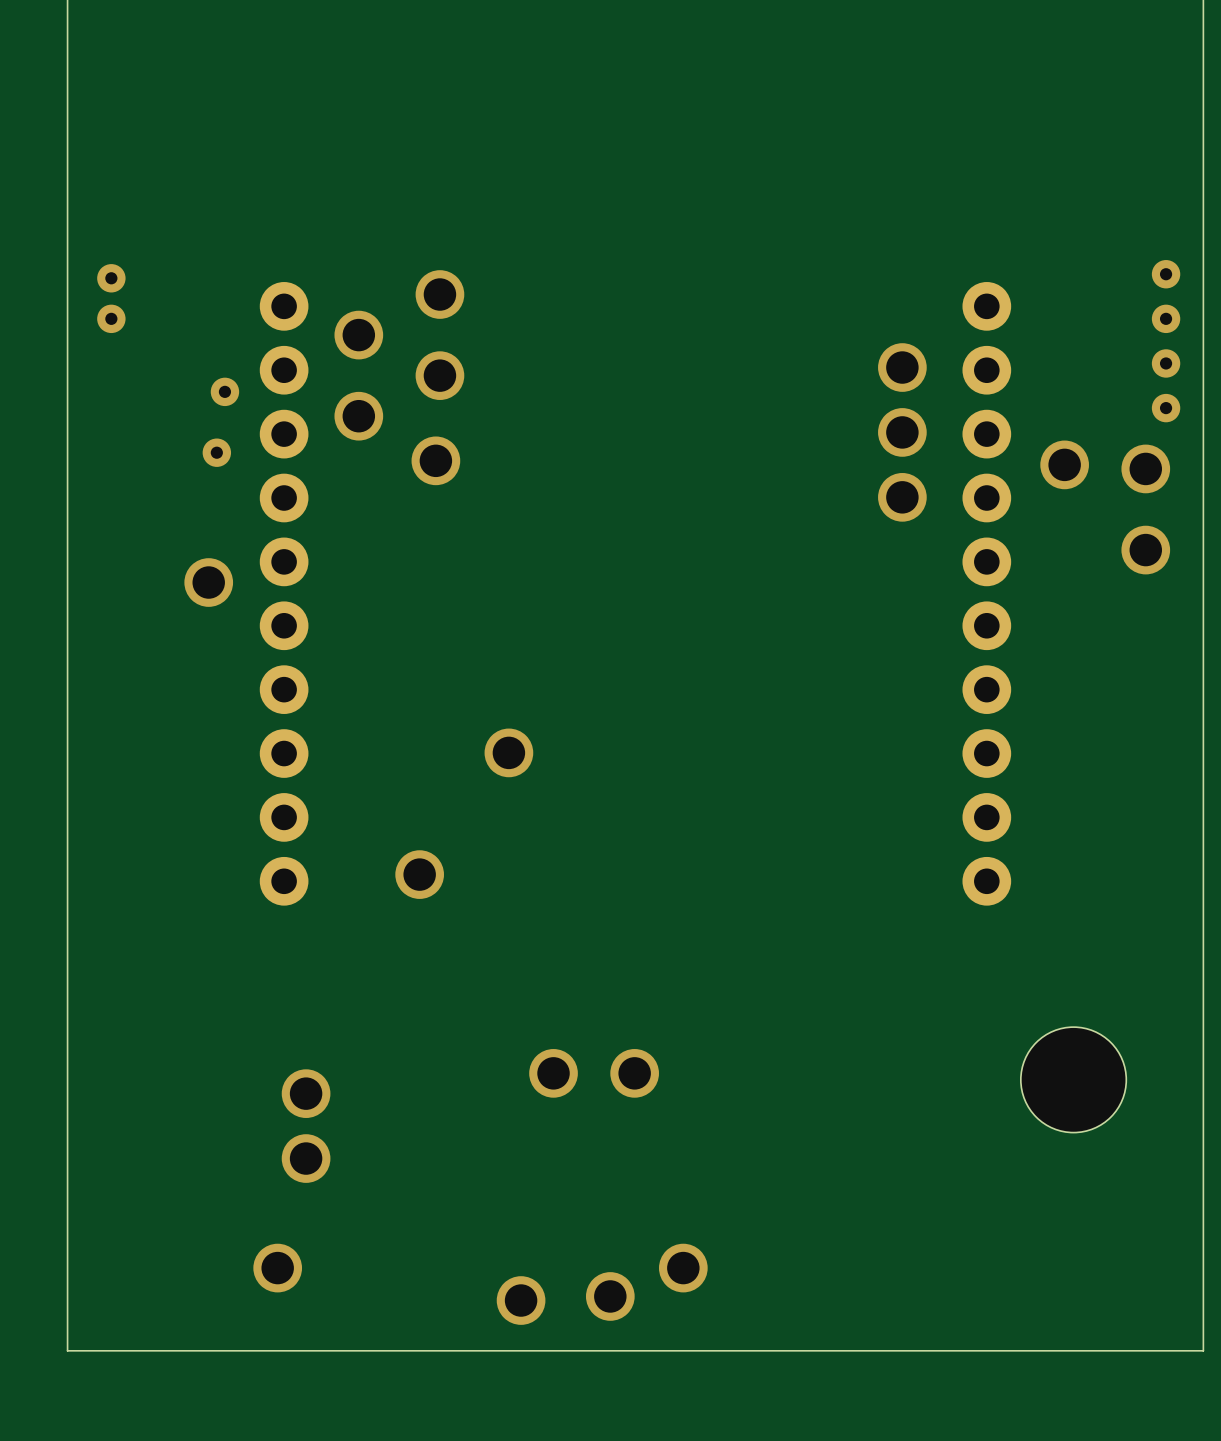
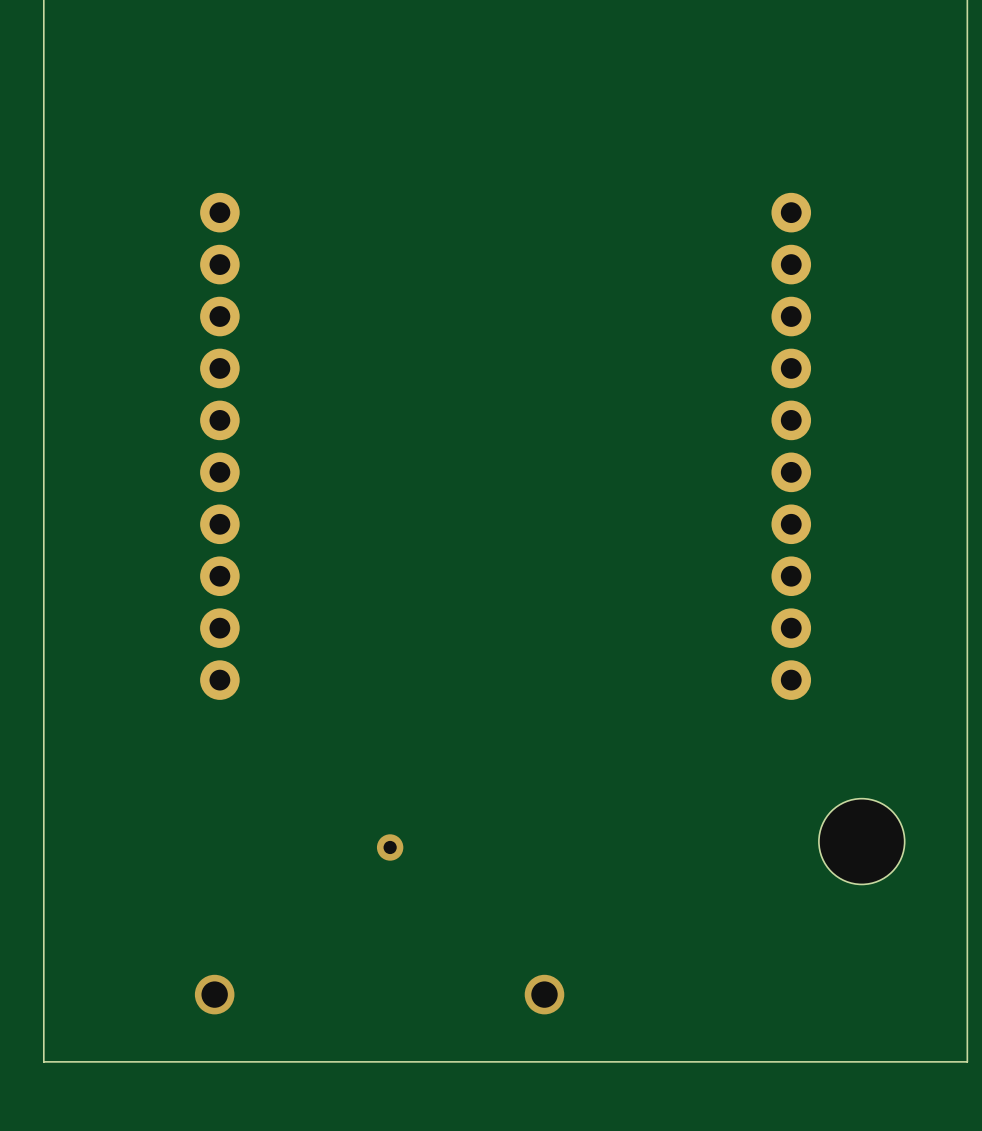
via: (1166, 274) -> none
via: (111, 278) -> none
via: (439, 294) -> none
via: (111, 318) -> none
via: (1166, 318) -> none
via: (358, 335) -> none
via: (1166, 363) -> none
via: (902, 367) -> none
via: (439, 375) -> none
via: (224, 391) -> none
via: (1166, 408) -> none
via: (358, 416) -> none
via: (902, 432) -> none
via: (216, 452) -> none
via: (435, 460) -> none
via: (1064, 464) -> none
via: (1145, 468) -> none
via: (902, 497) -> none
via: (1145, 550) -> none
via: (208, 582) -> none
via: (508, 752) -> none
via: (419, 874) -> none
via: (553, 1073) -> none
via: (634, 1073) -> none
via: none -> (390, 847)
via: (306, 1093) -> none
via: (306, 1158) -> none
via: (610, 1296) -> none
via: (521, 1300) -> none

